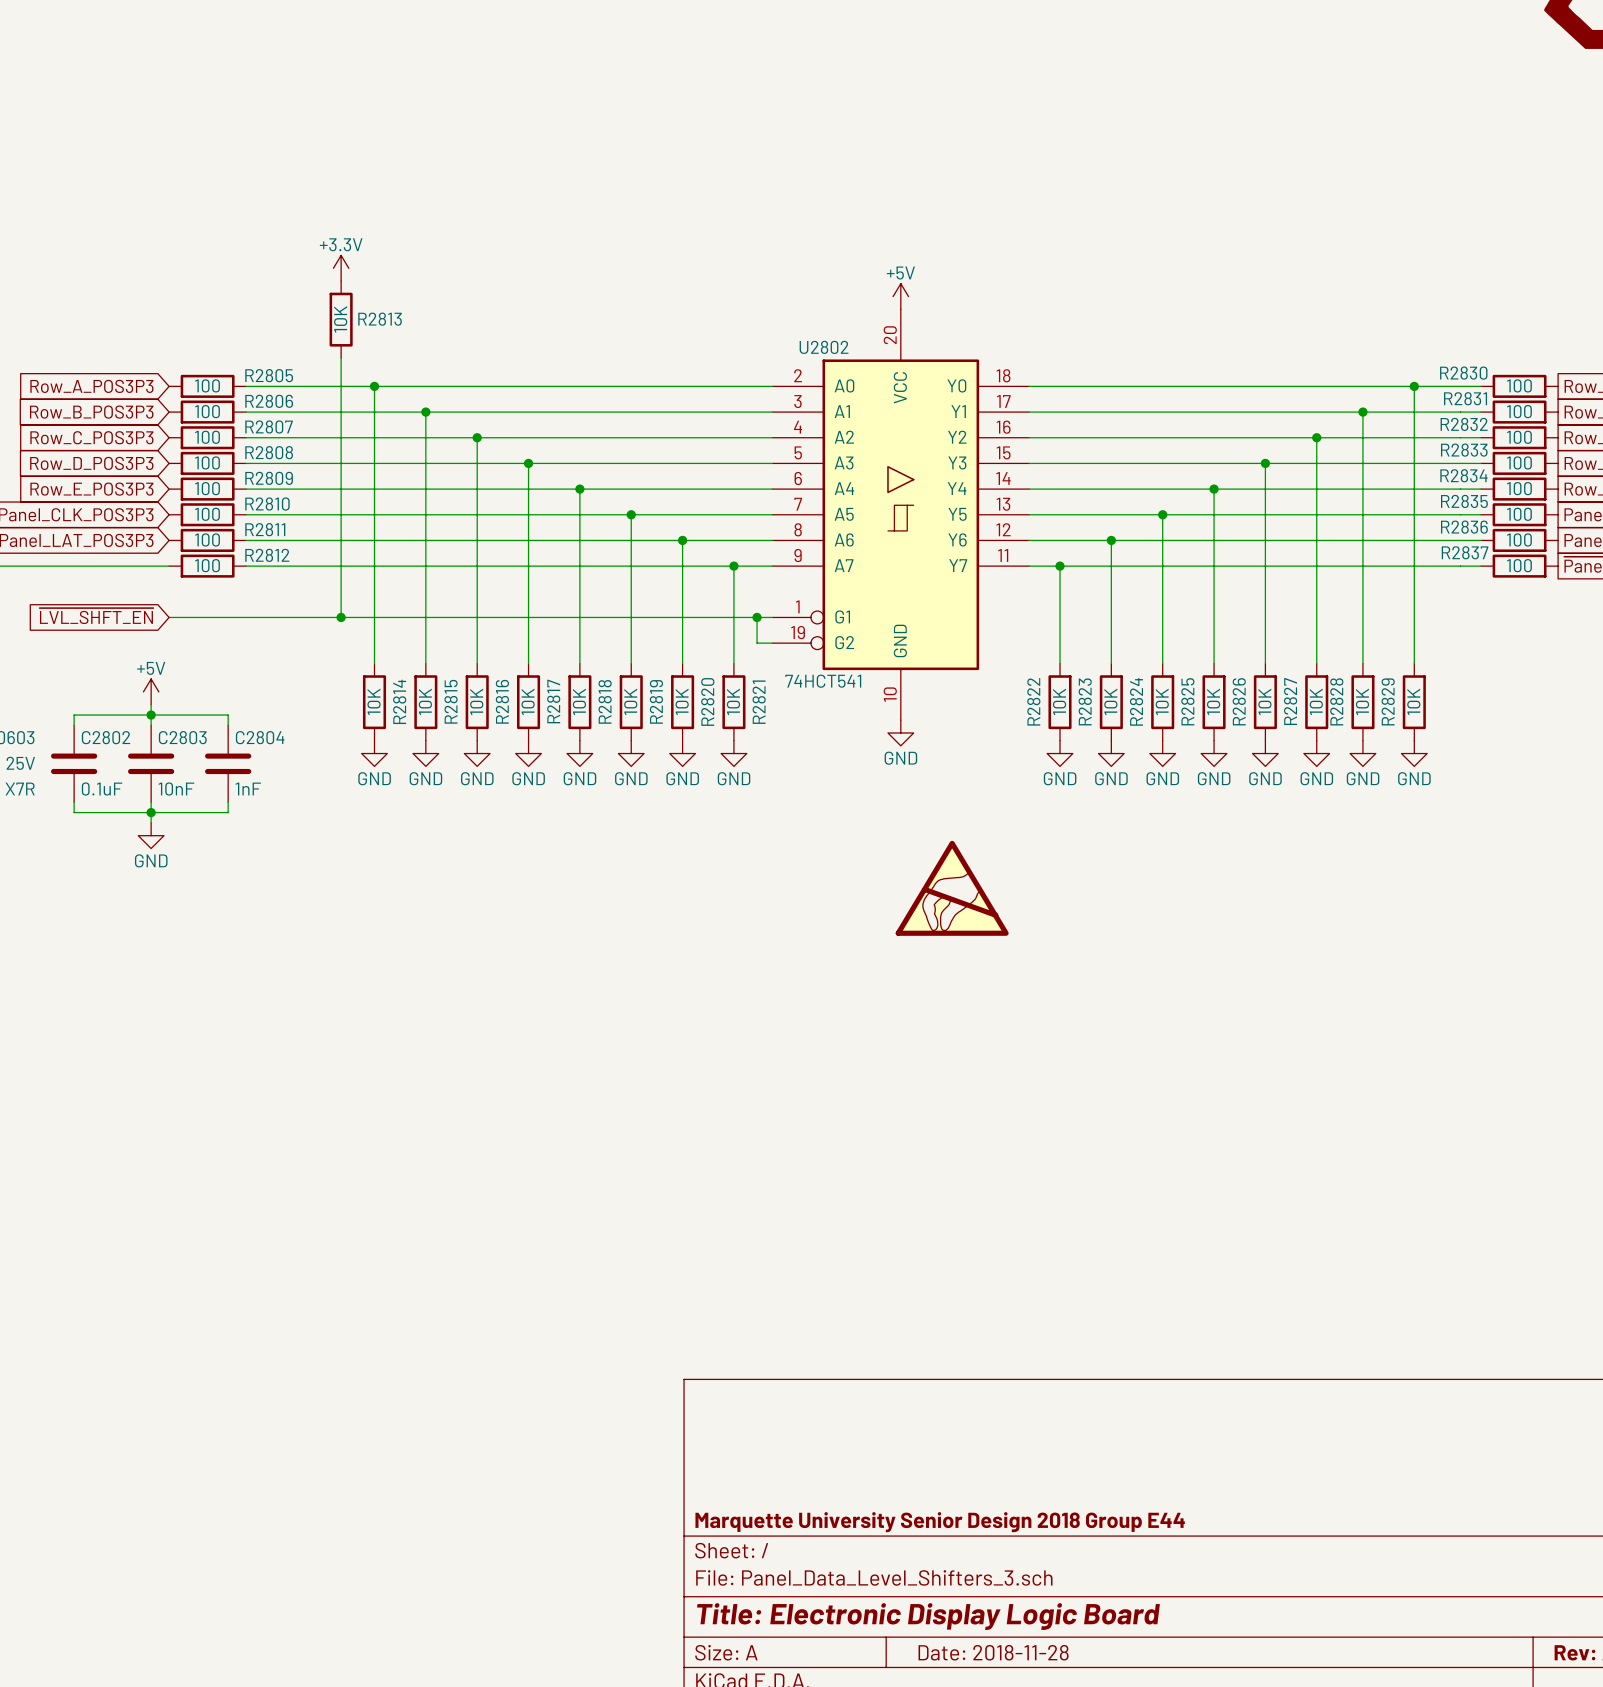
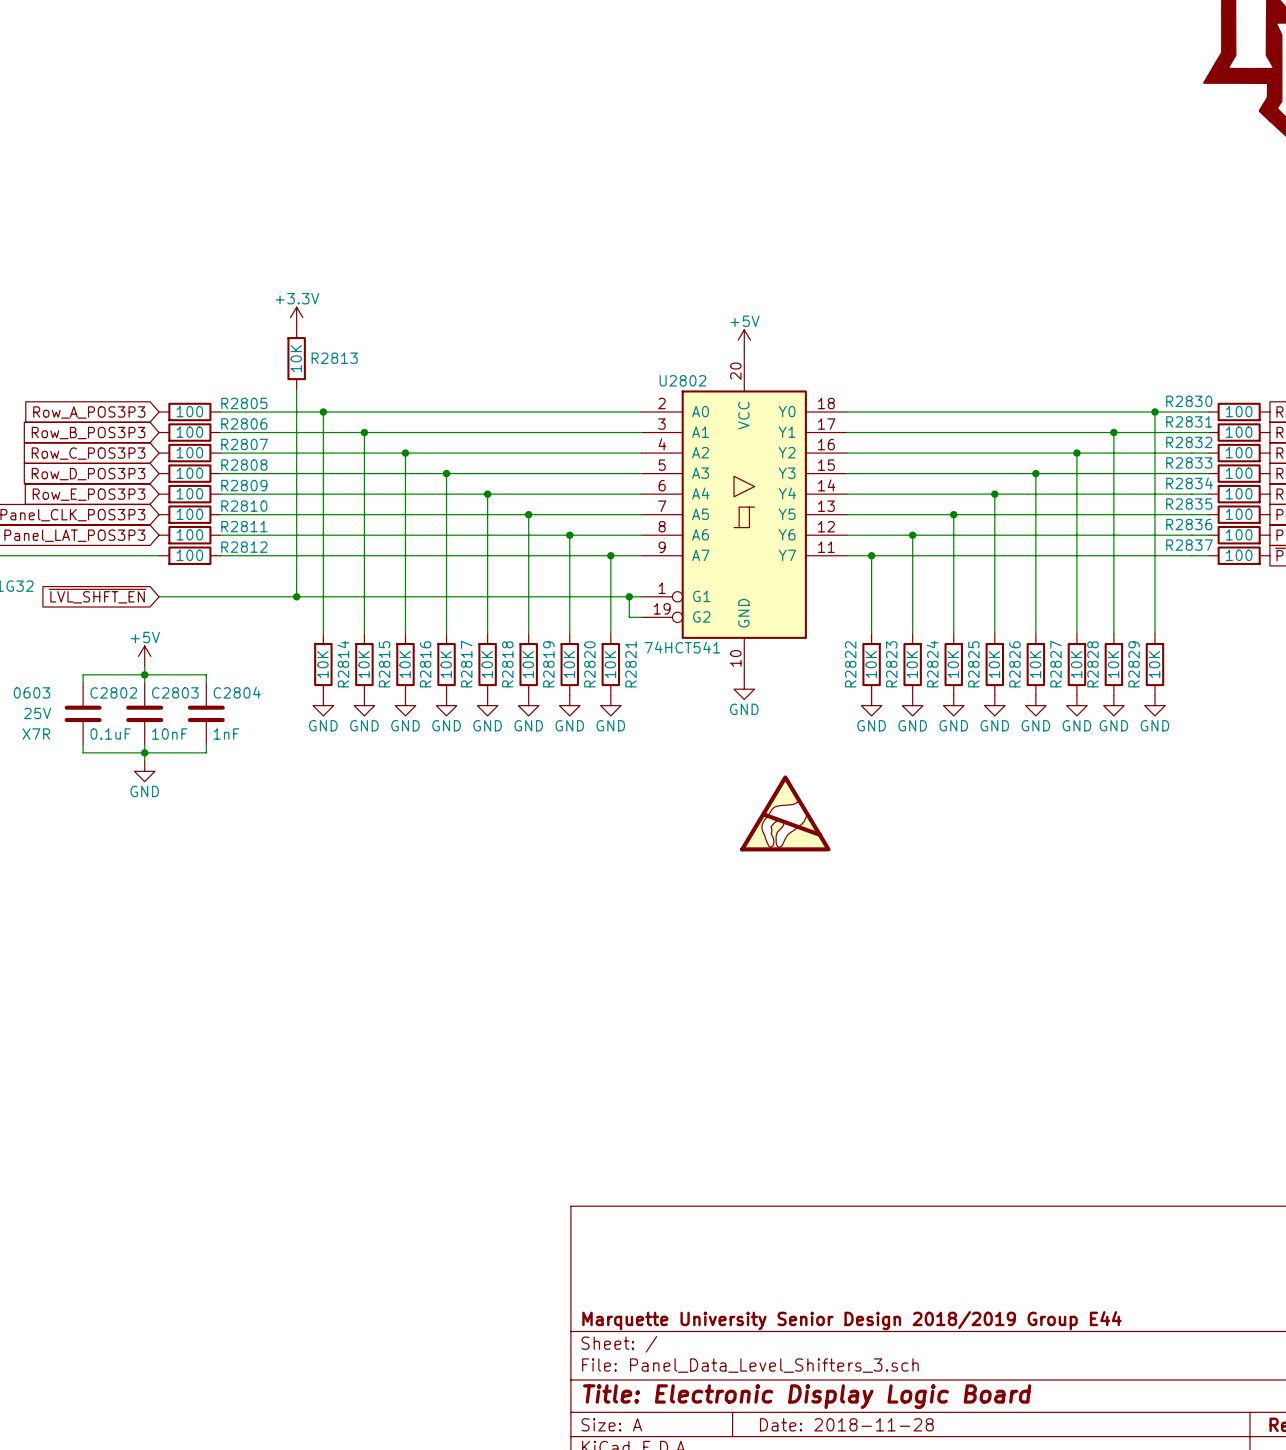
title block: Marquette University Senior Design 2018 Group E44 (940, 1522) -> Marquette University Senior Design 2018/2019 Group E44 (851, 1320)

